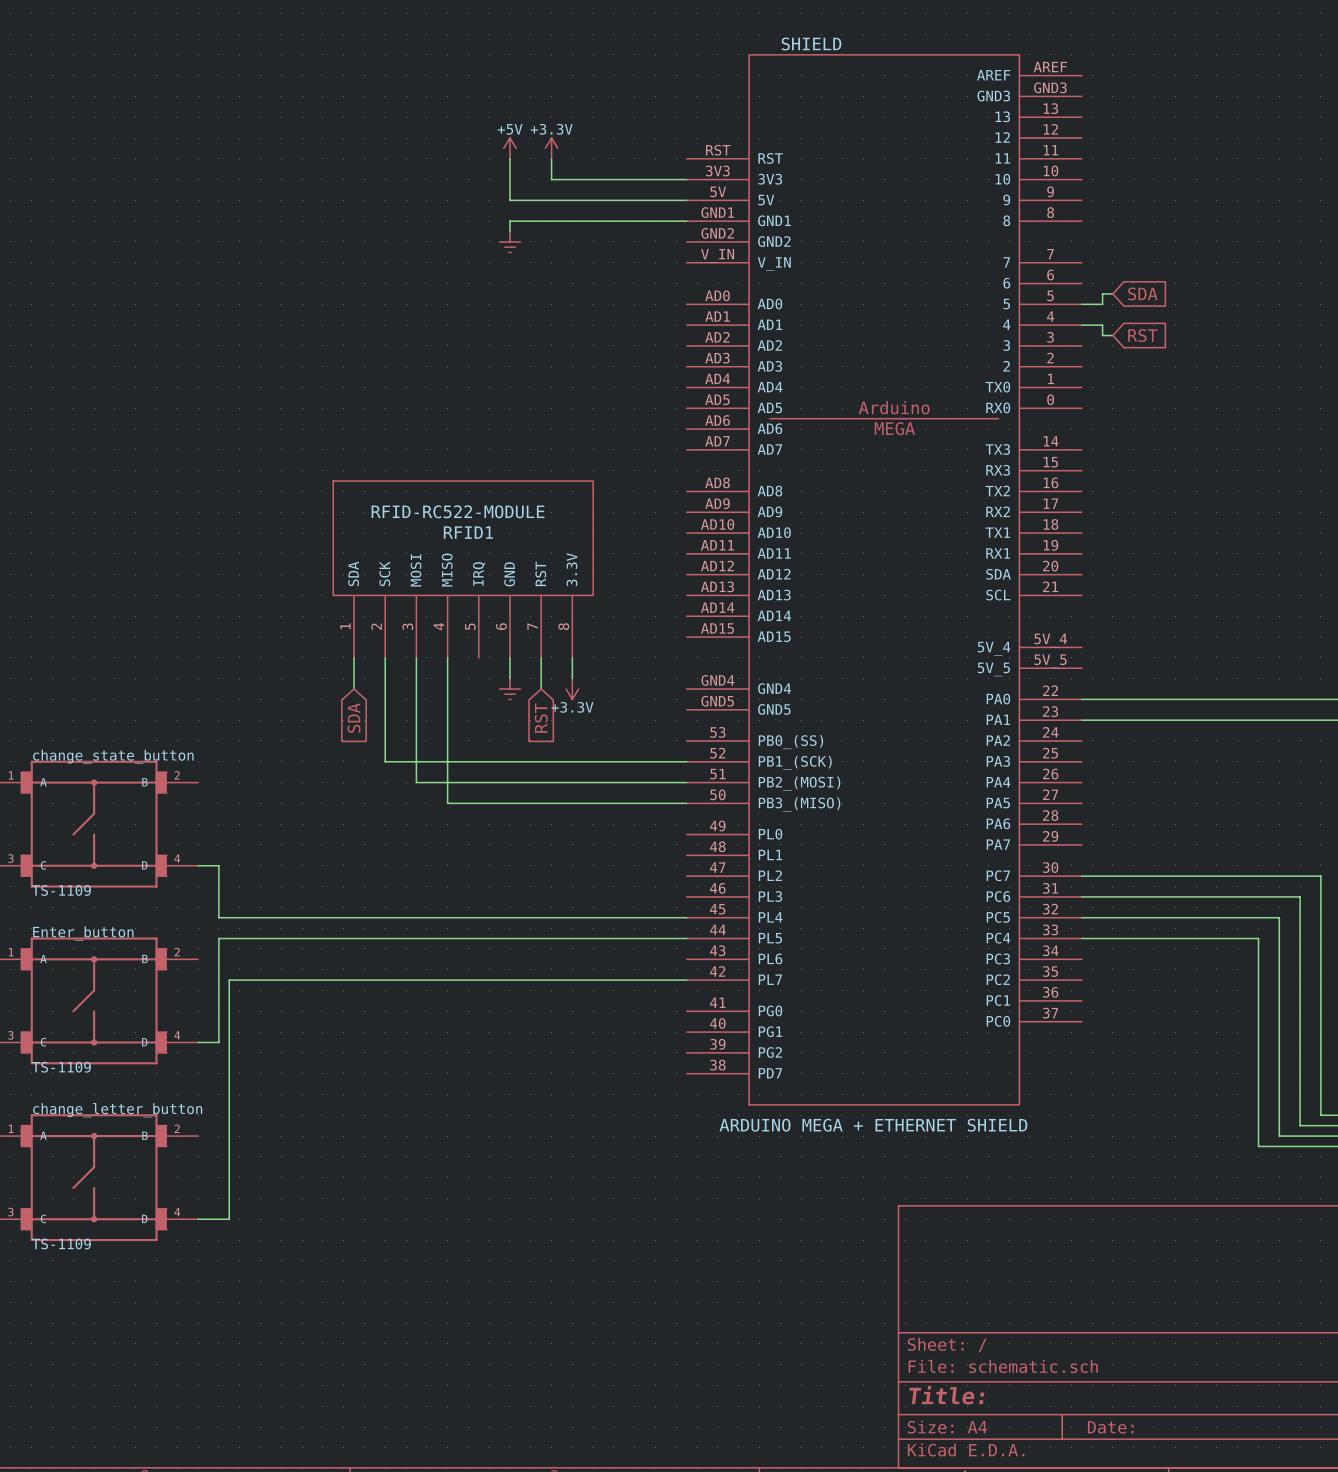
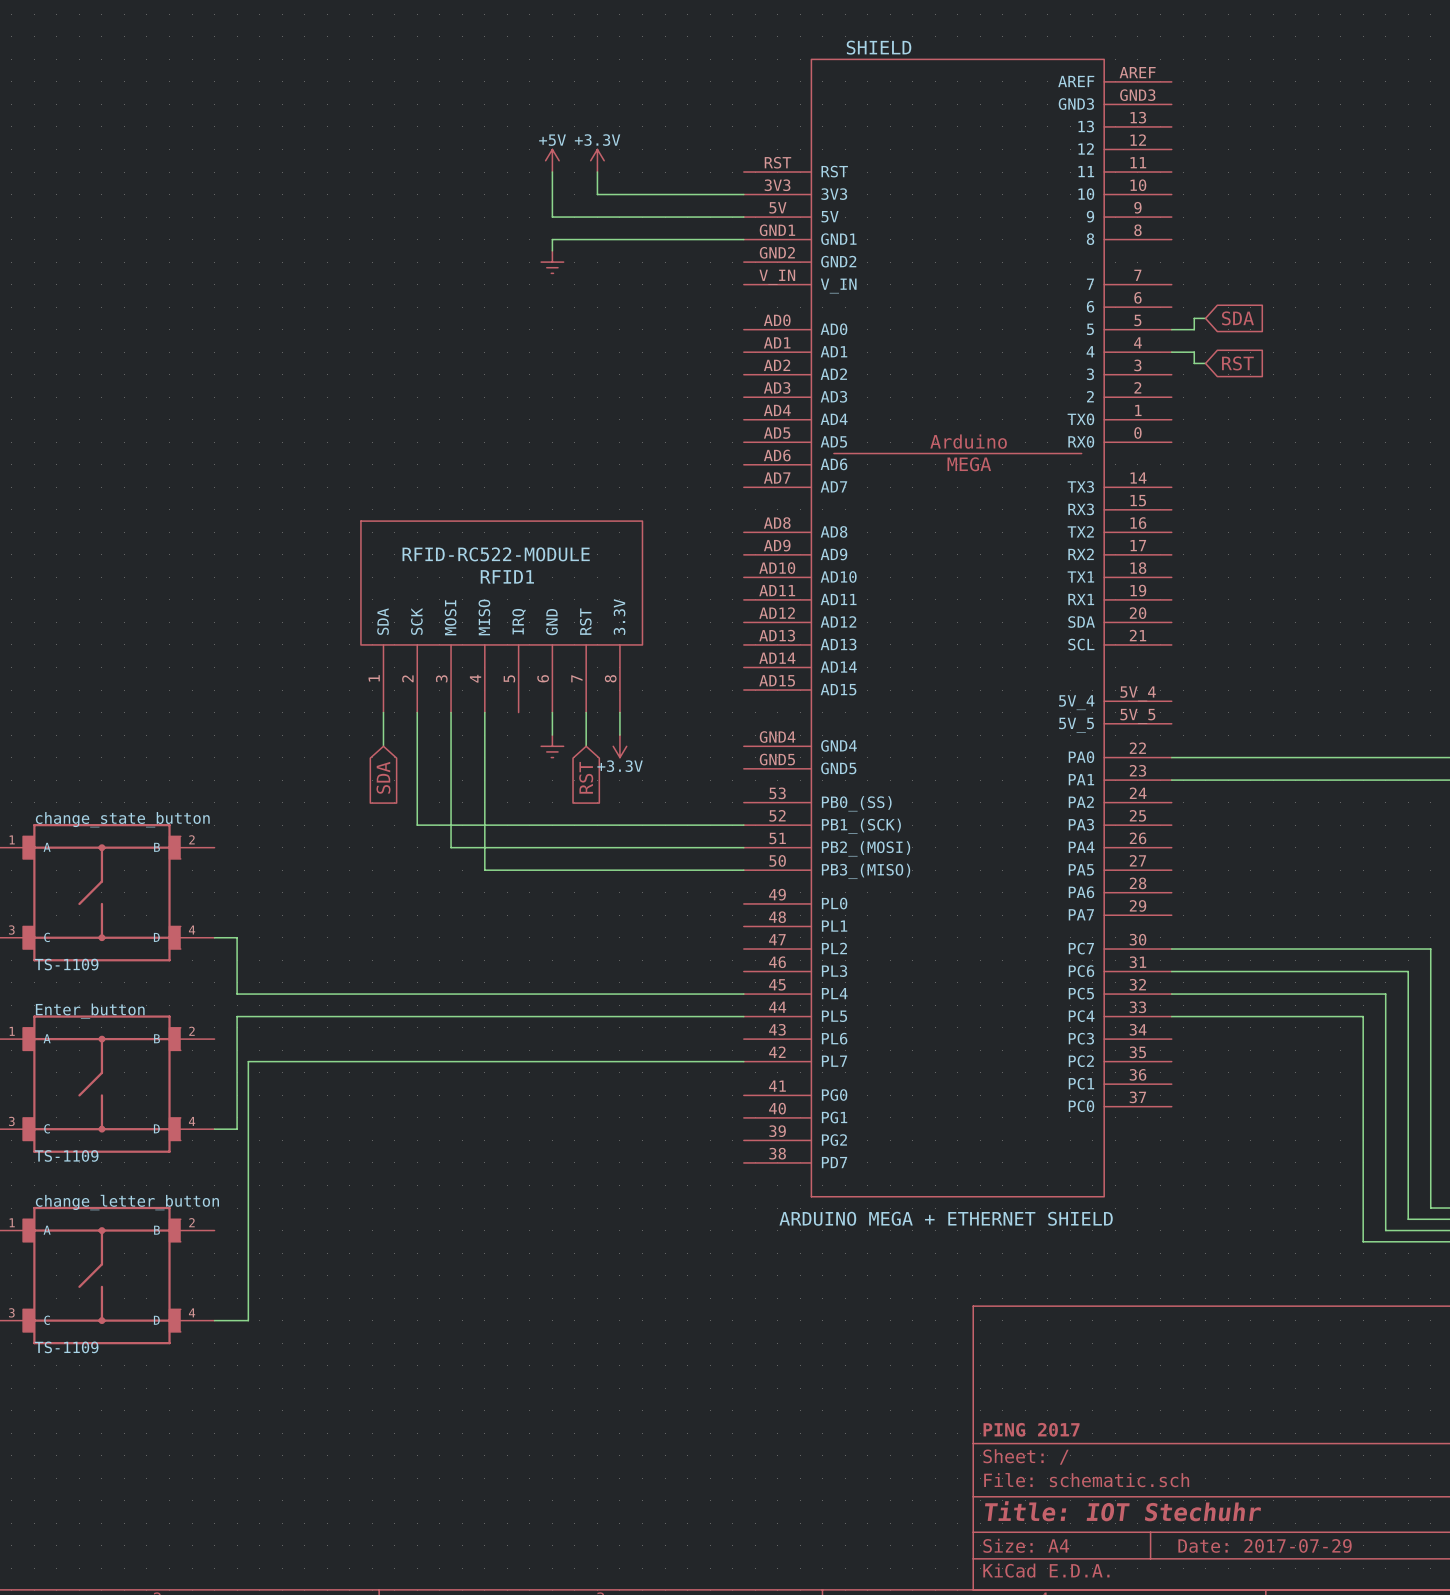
title block: none -> PING 2017 (1031, 1429)
title block: Title: (946, 1395) -> Title: IOT Stechuhr (1122, 1511)
title block: Date: (1110, 1427) -> Date: 2017-07-29 (1265, 1545)

